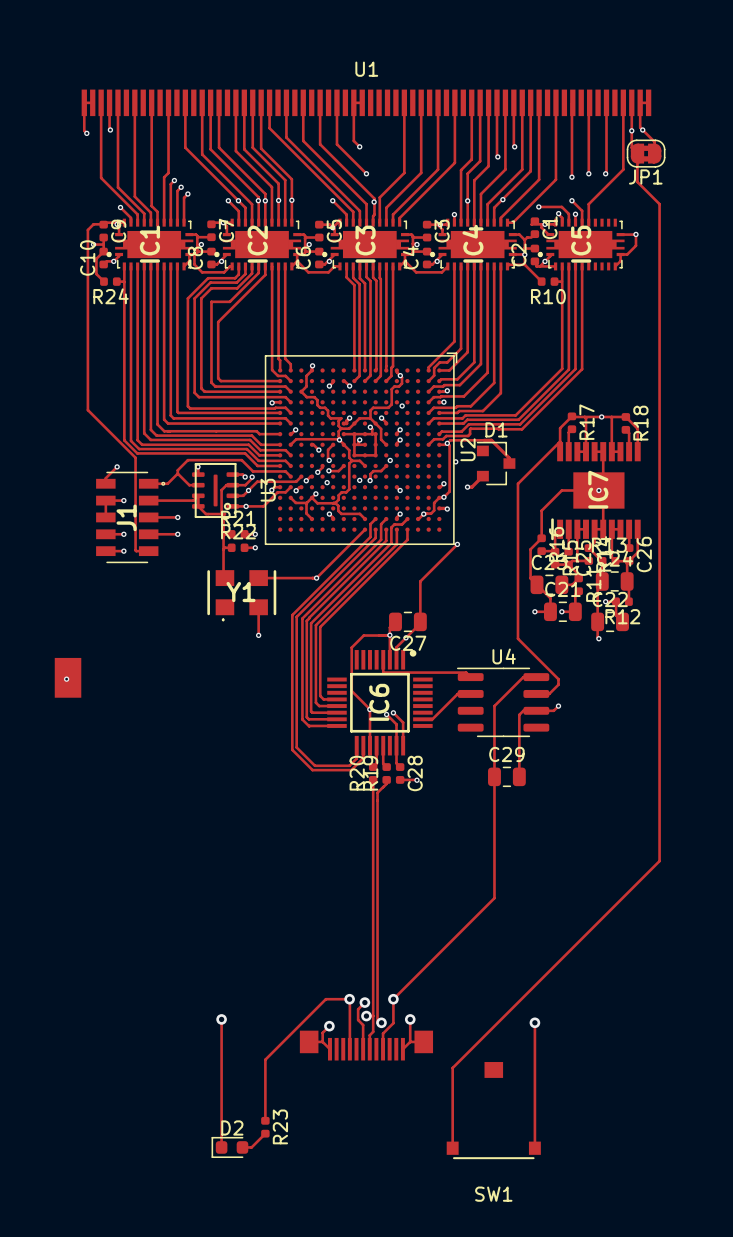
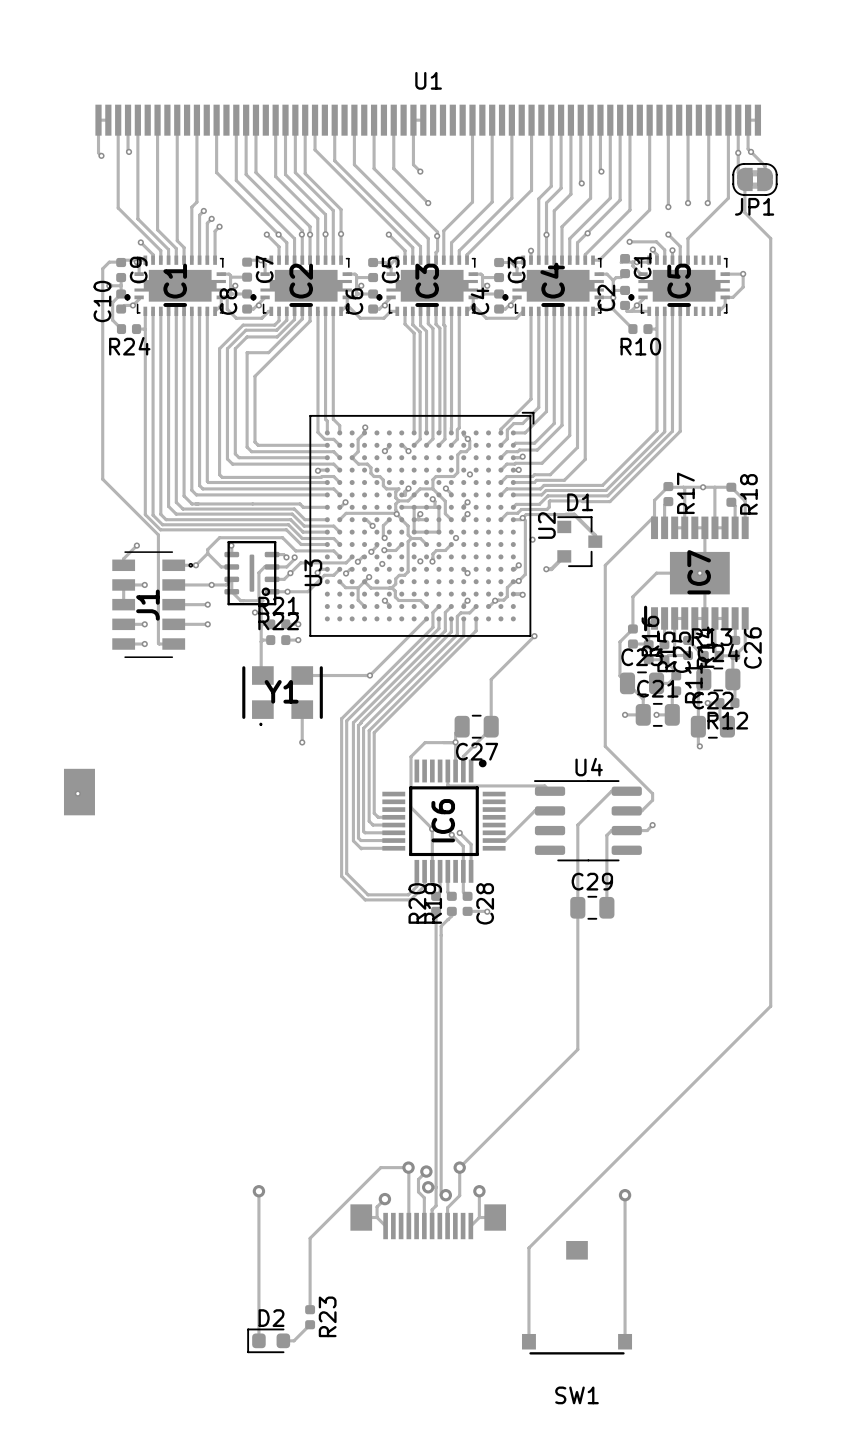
via: none -> (195, 565)
via: none -> (211, 584)
via: none -> (254, 612)

